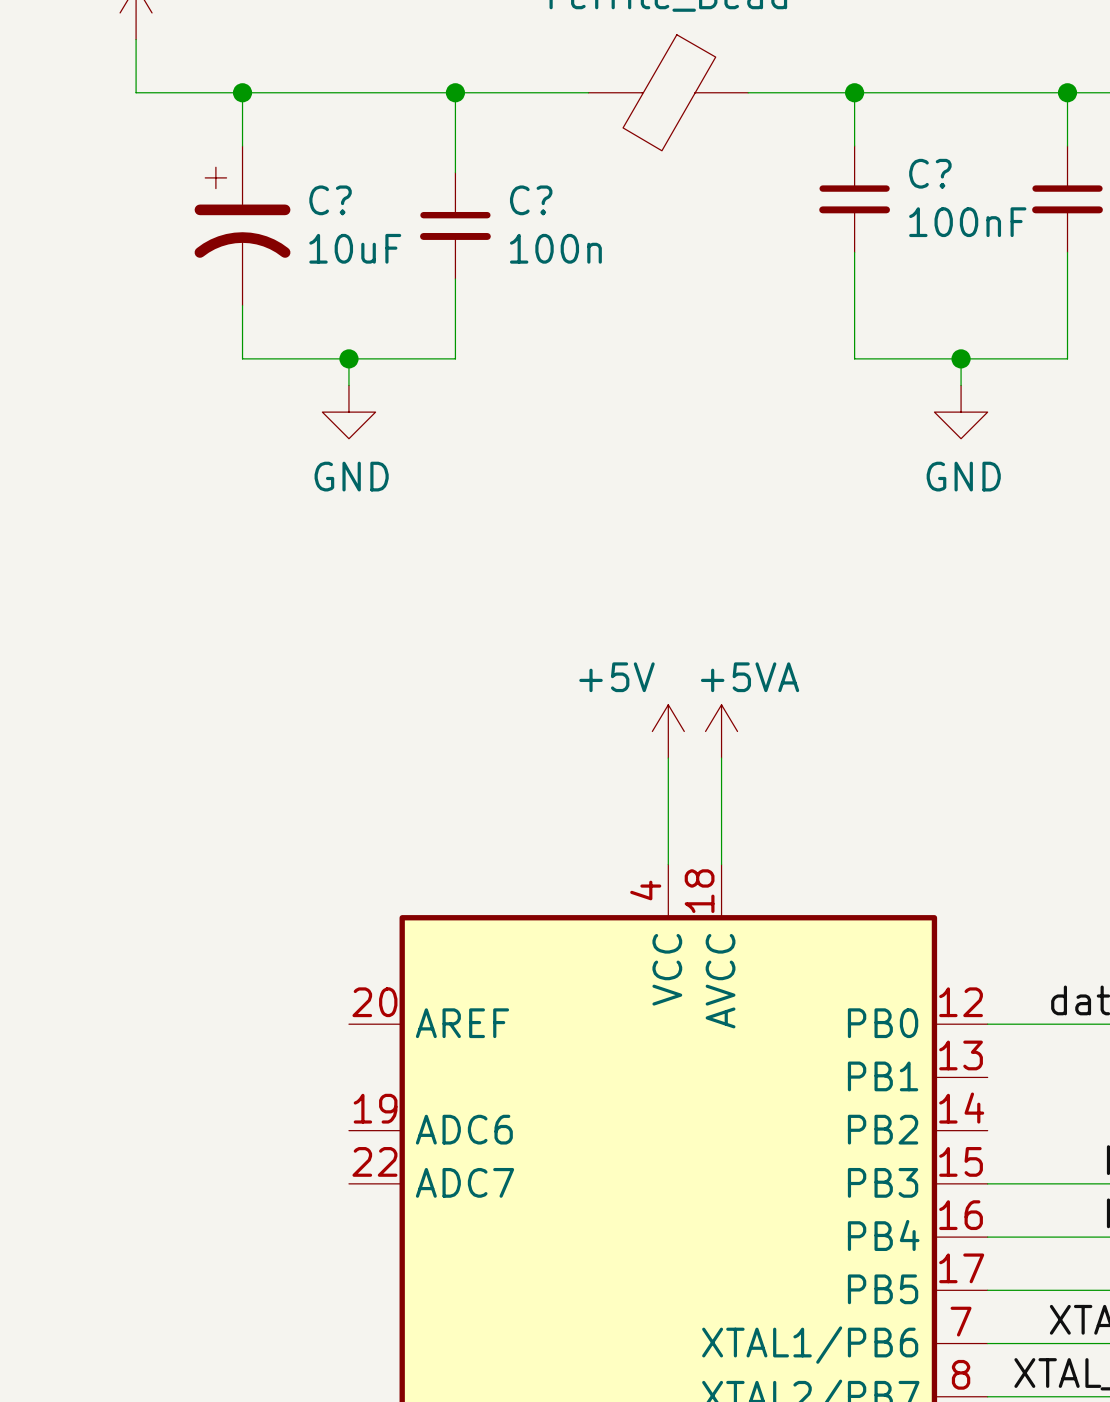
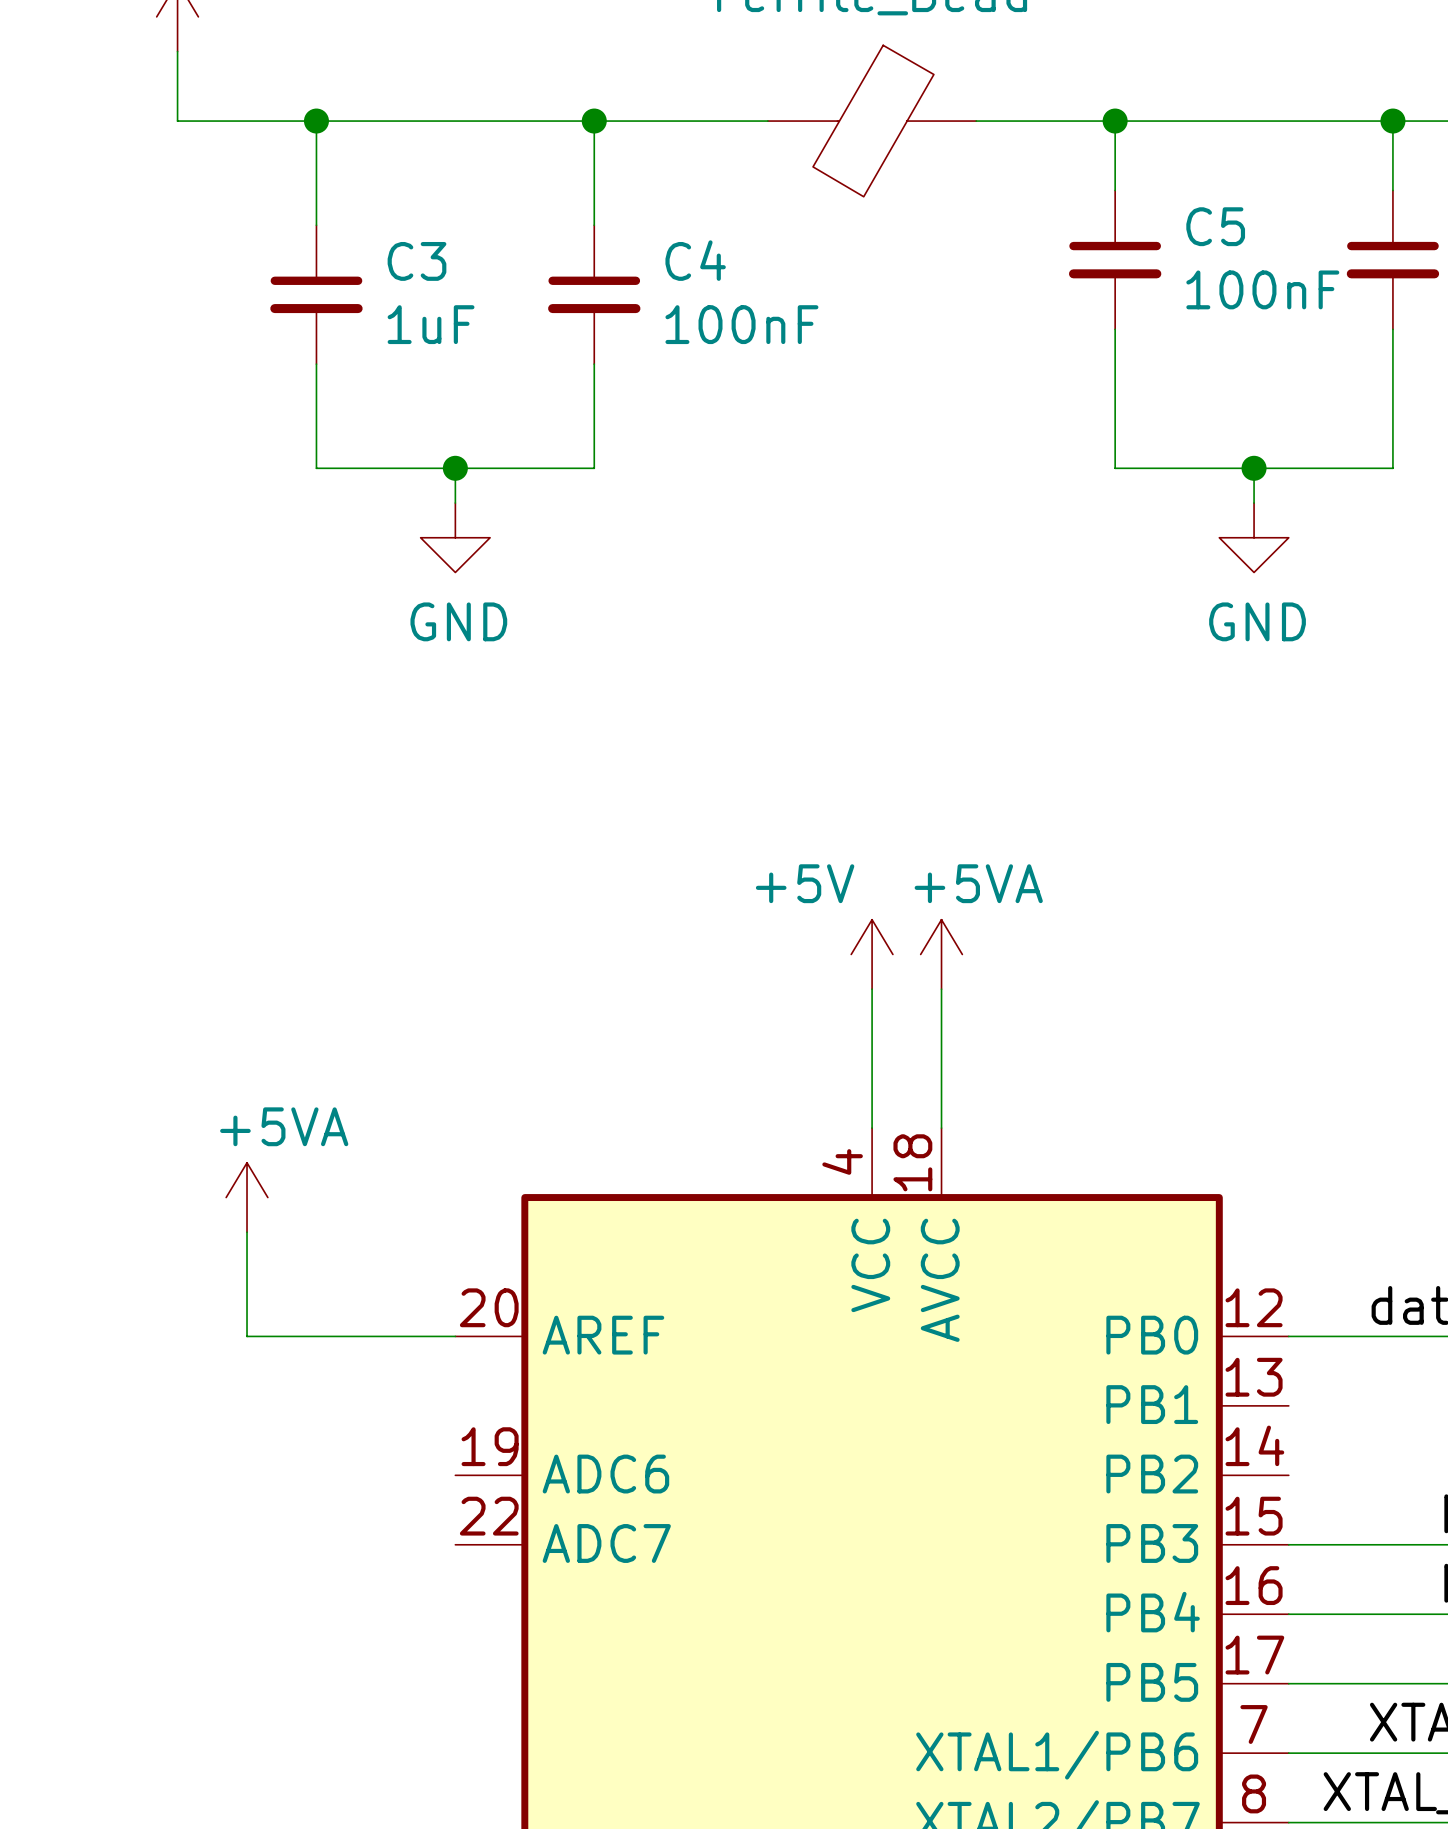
C? name: C? (930, 173) -> C5 (1215, 226)
C? name: C? (531, 200) -> C4 (695, 260)
C?: 10uF (242, 225) -> none
C3: none -> 1uF (316, 294)
C? value: 100n (555, 248) -> 100nF (741, 324)
power symbol: none -> +5VA (247, 1197)
wire: none -> (247, 1232) (247, 1336) (455, 1336)

